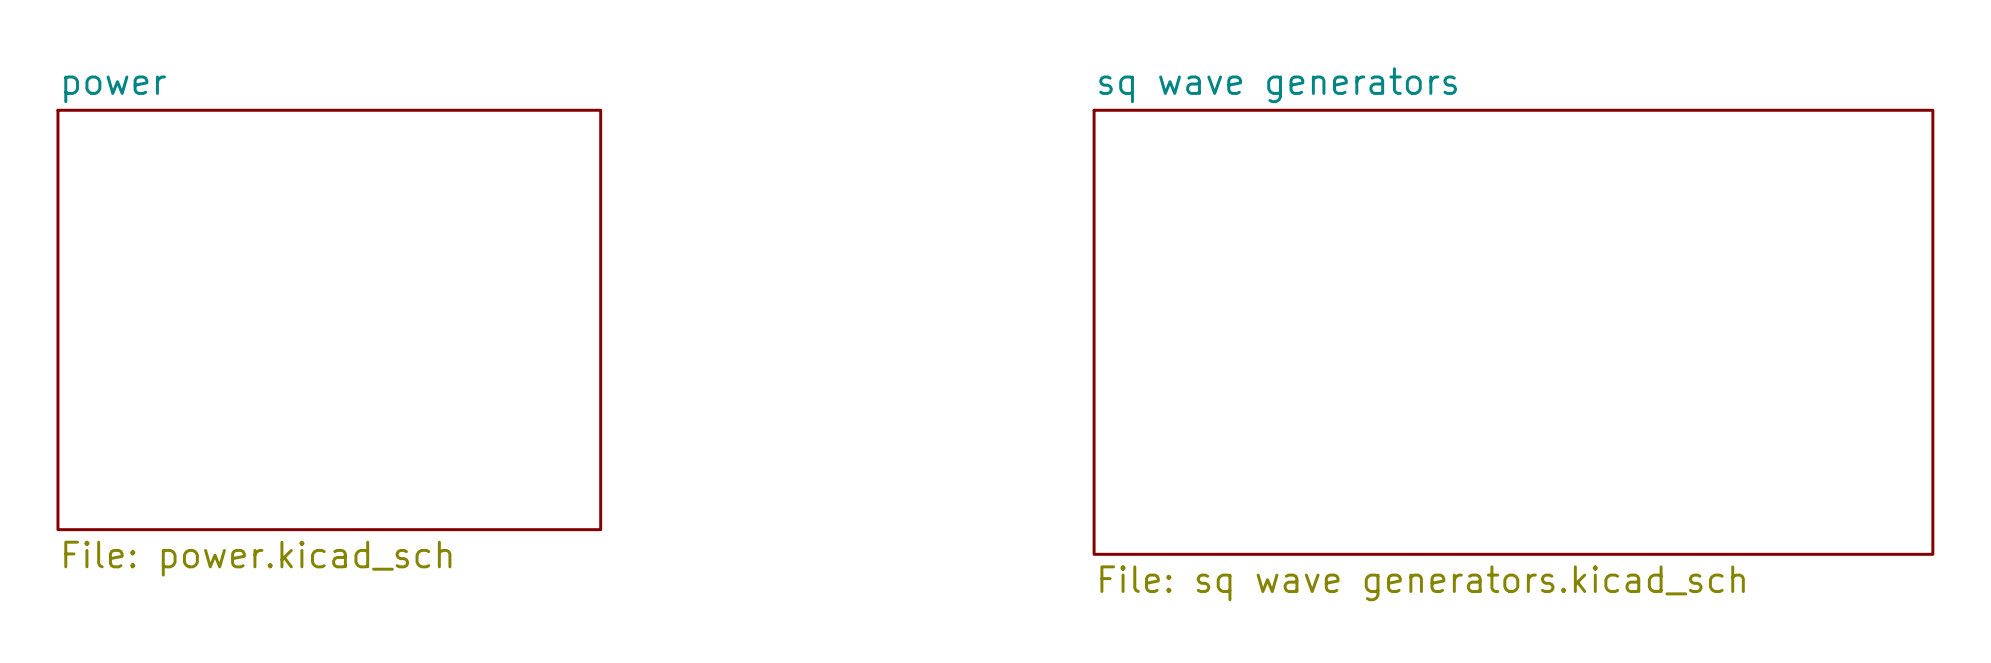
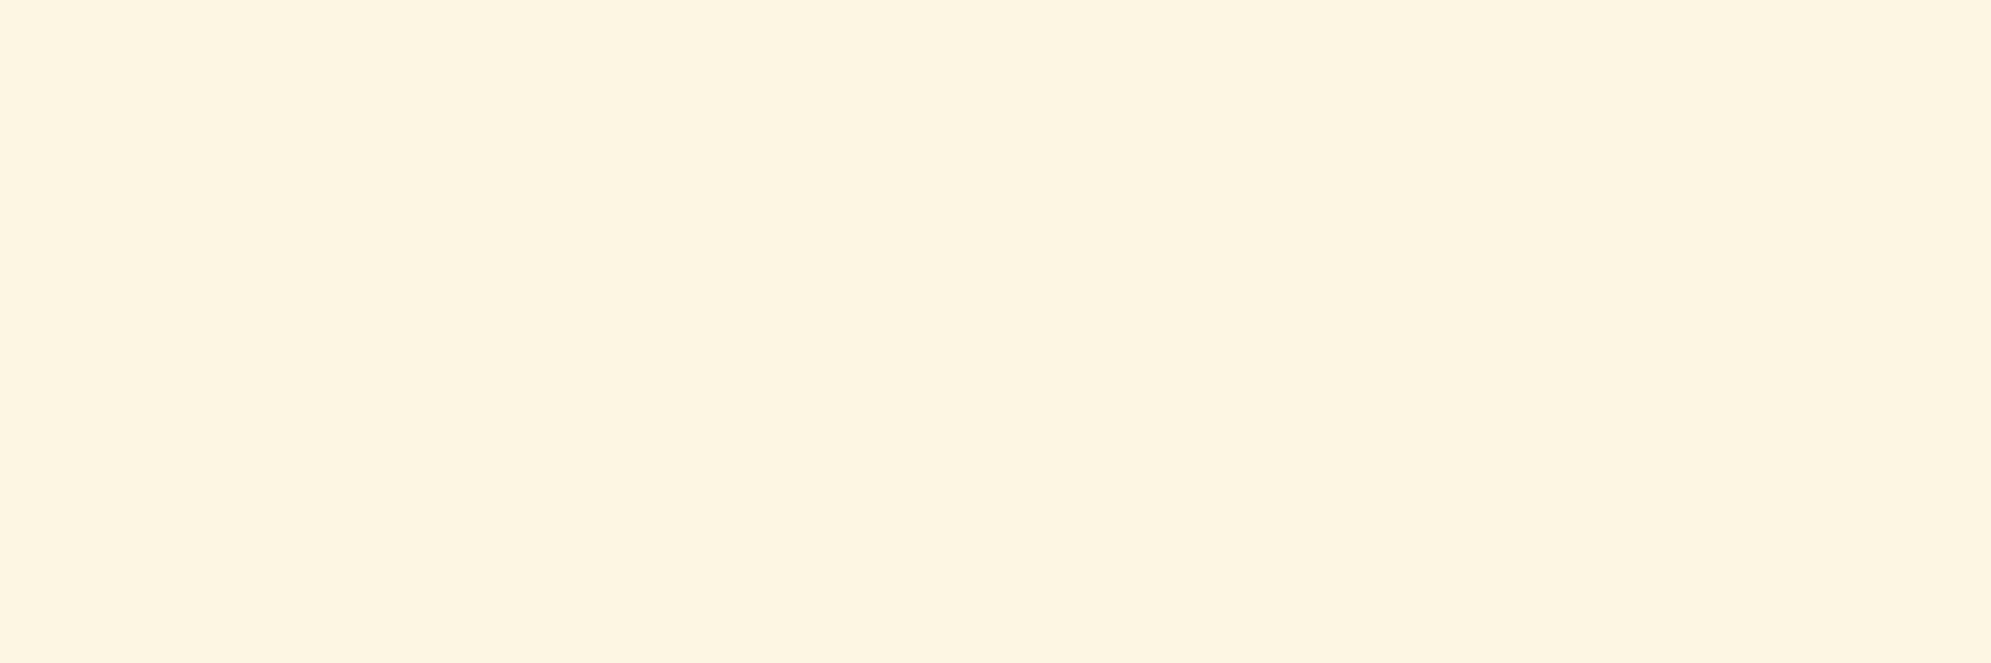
sheet power: File: power.kicad_sch (329, 319) -> none
sheet sq wave generators: File: sq wave generators.kicad_sch (1513, 332) -> none

